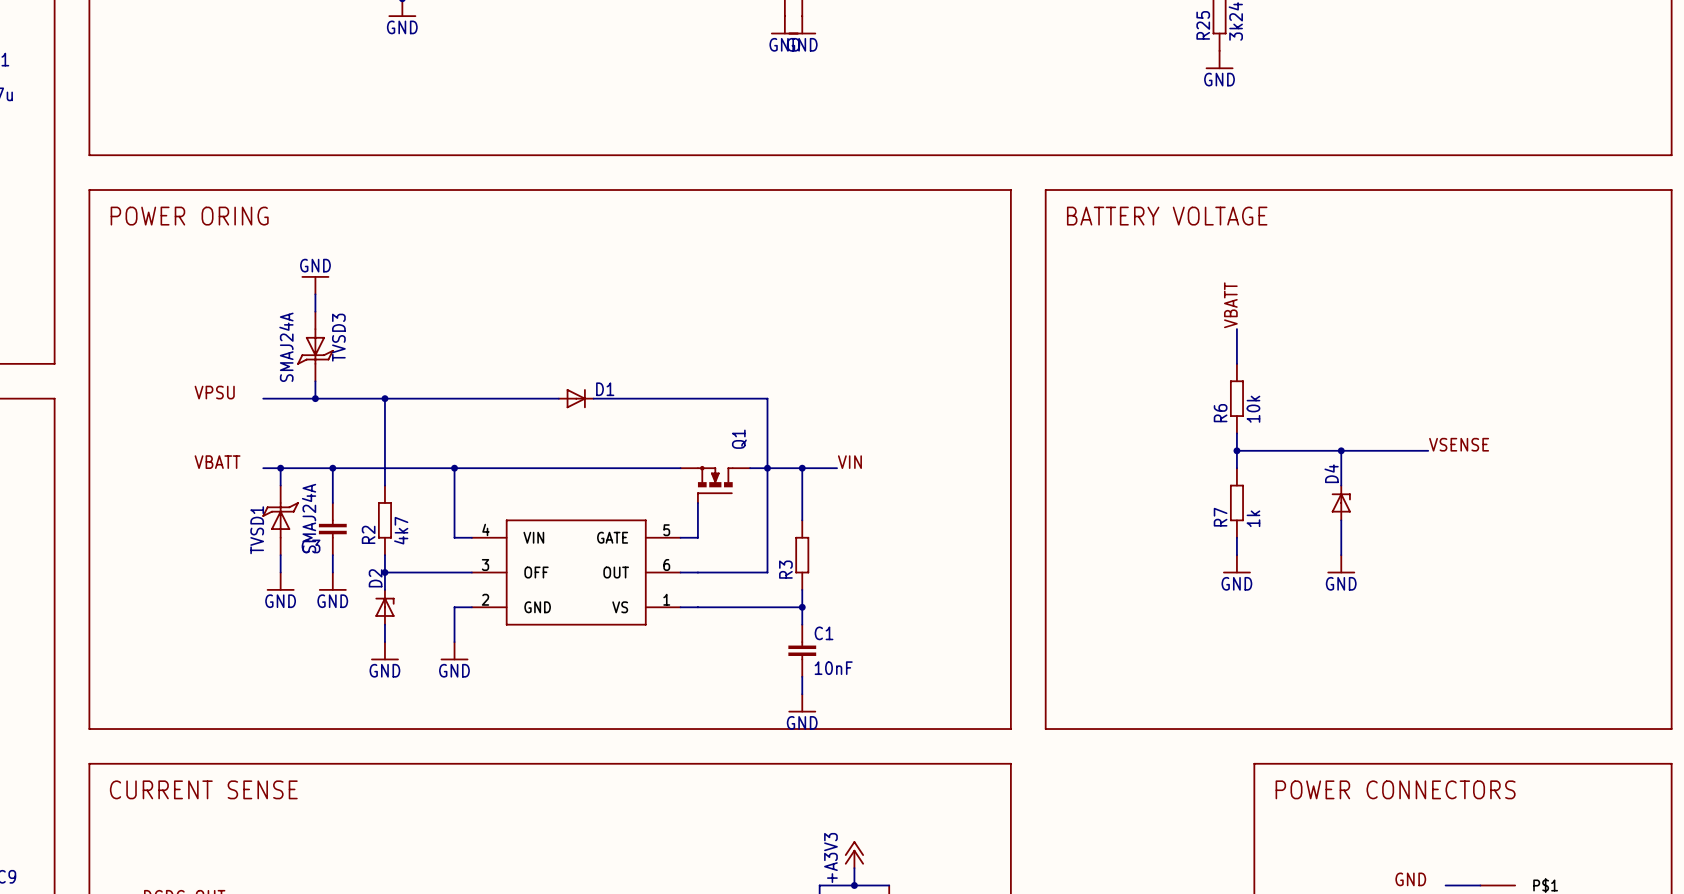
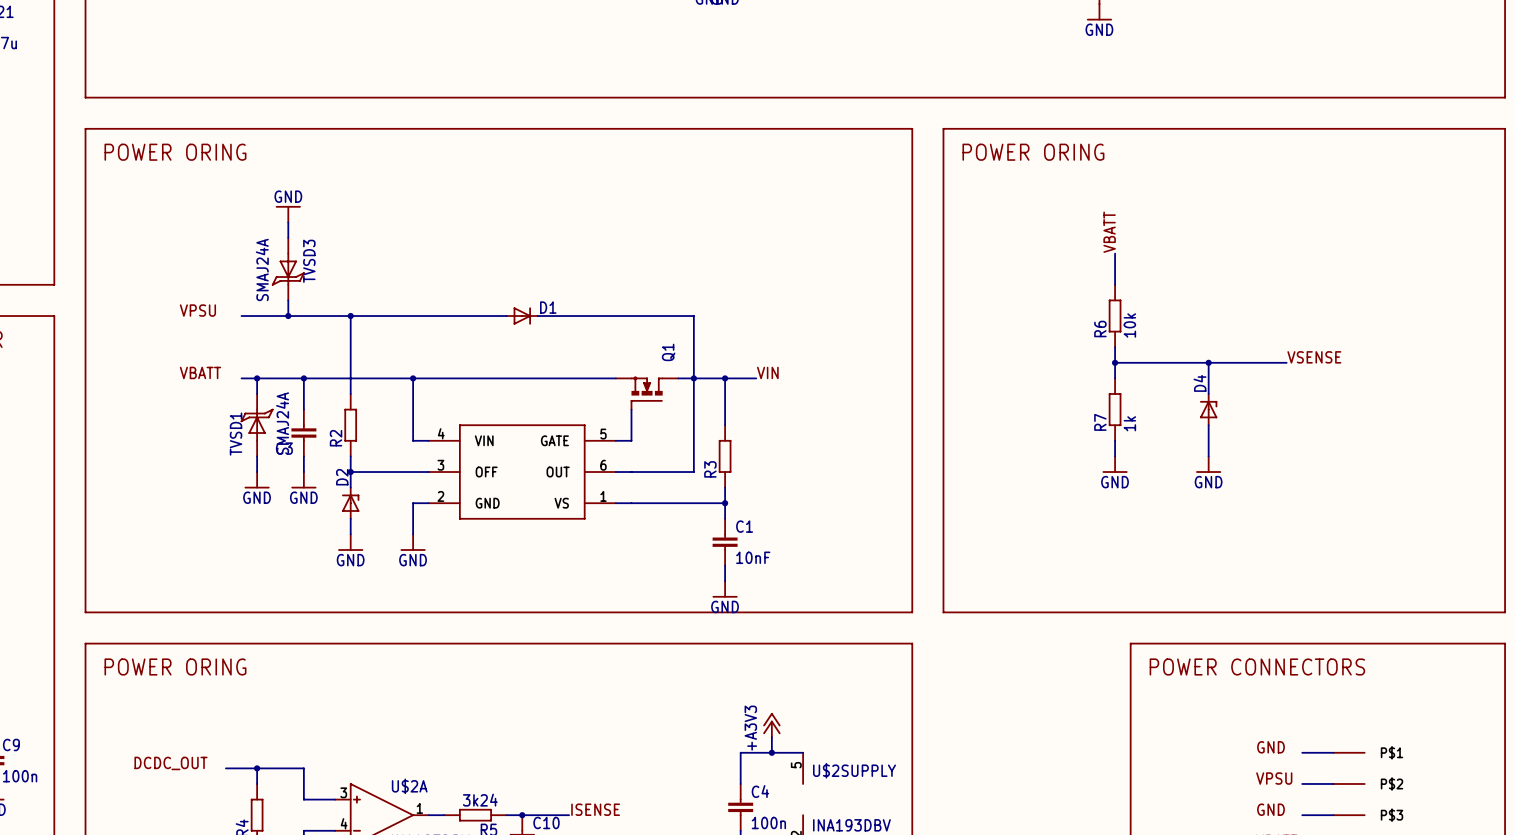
text: BATTERY VOLTAGE (1167, 216) -> POWER ORING (1033, 152)
R2 value: 4k7 (401, 530) -> none
text: CURRENT SENSE (203, 789) -> POWER ORING (175, 666)

